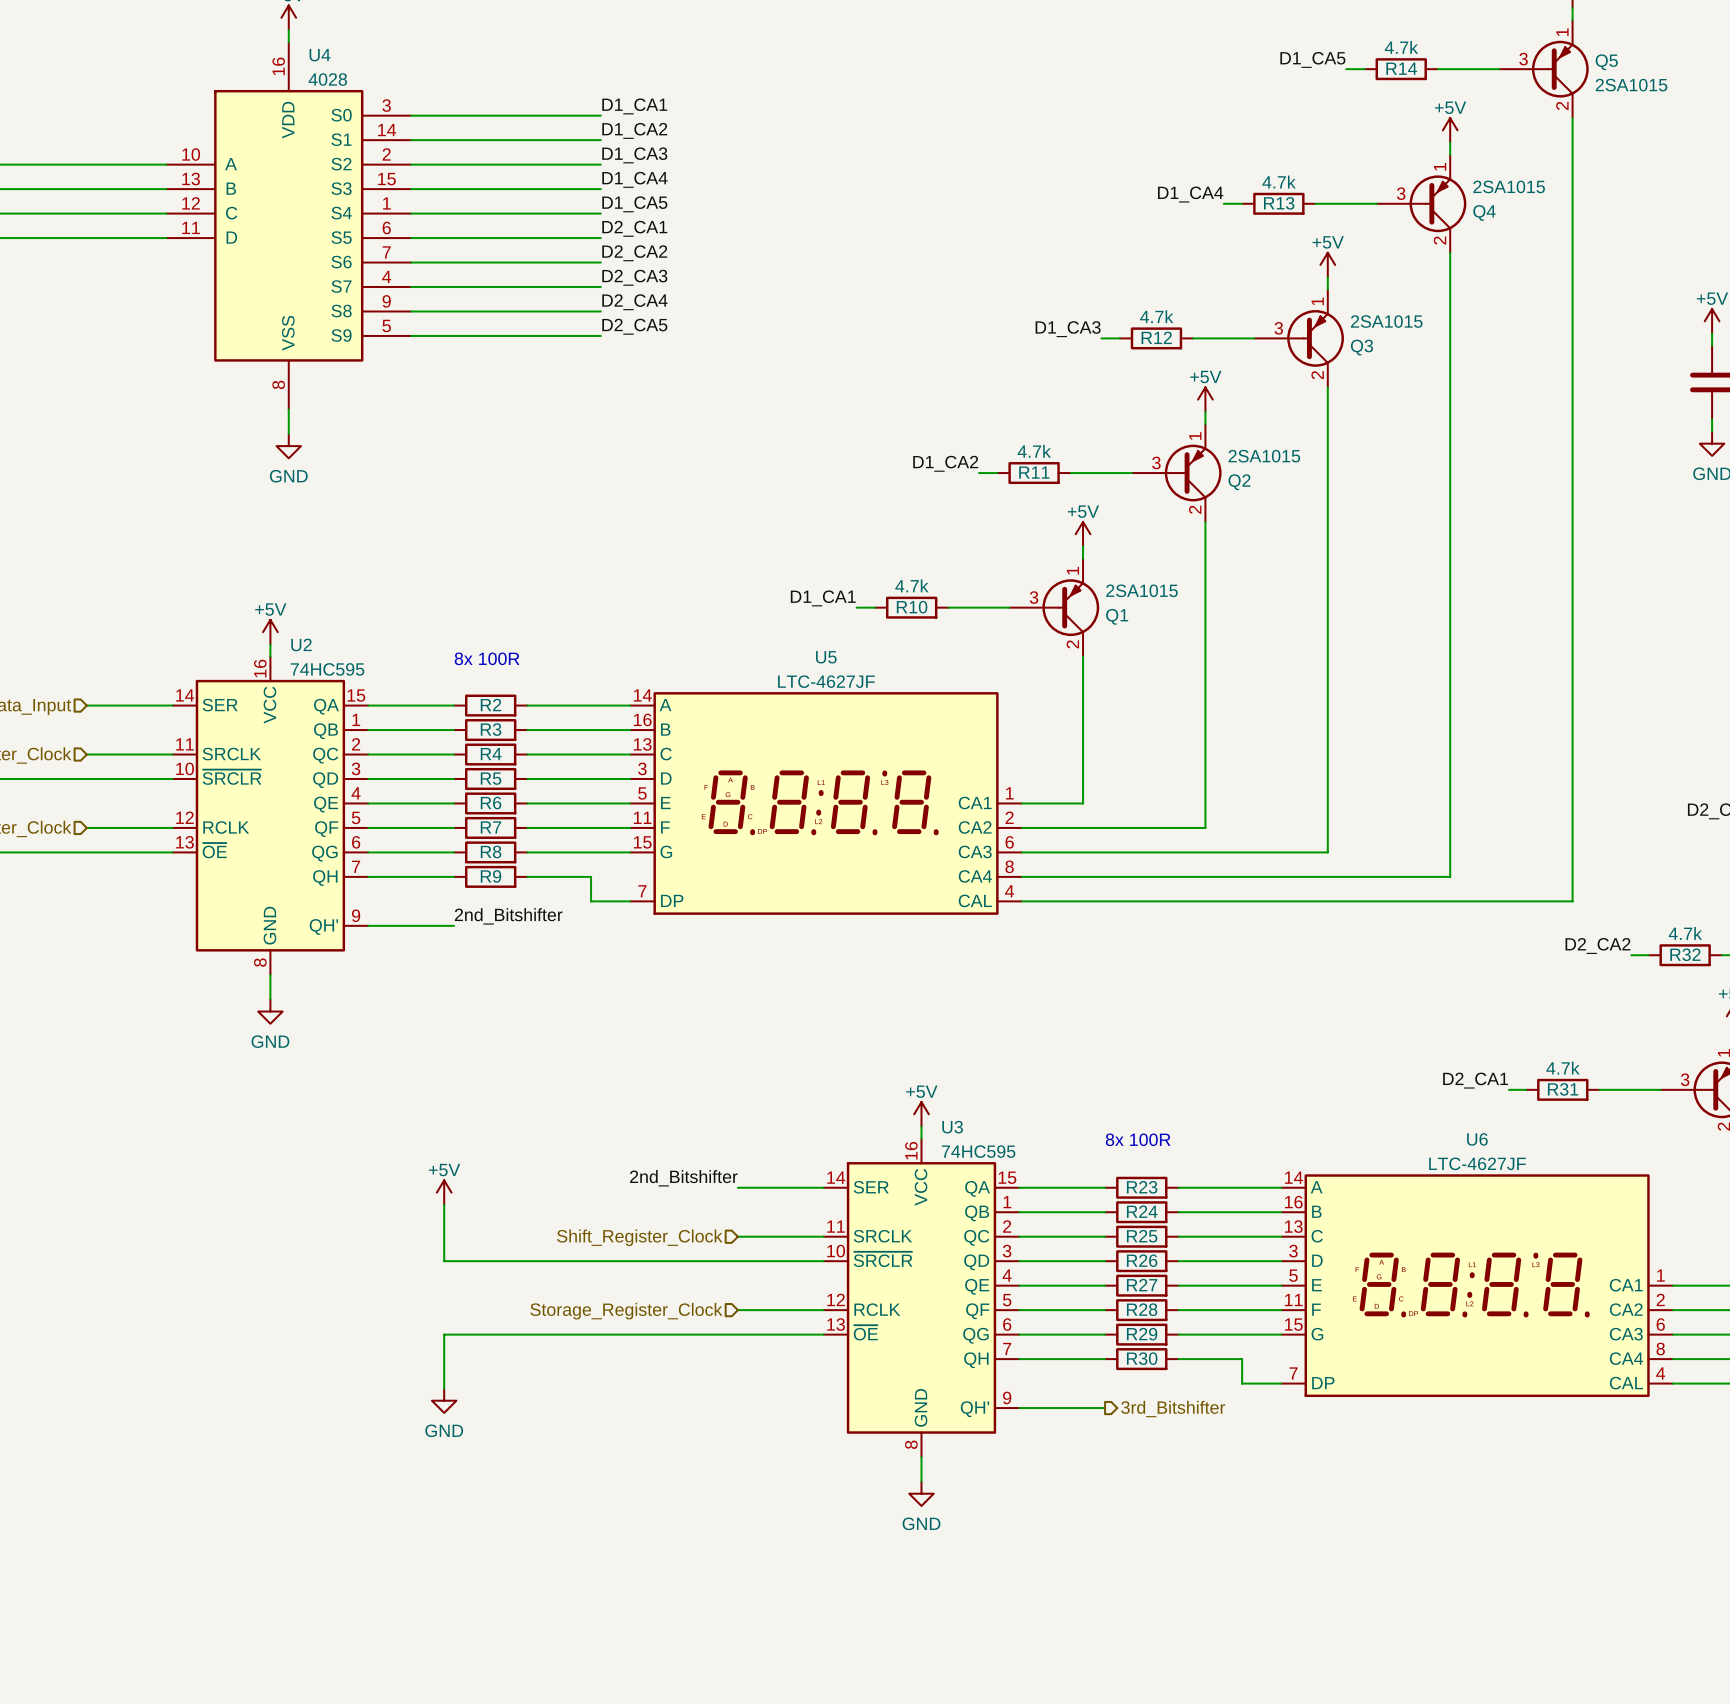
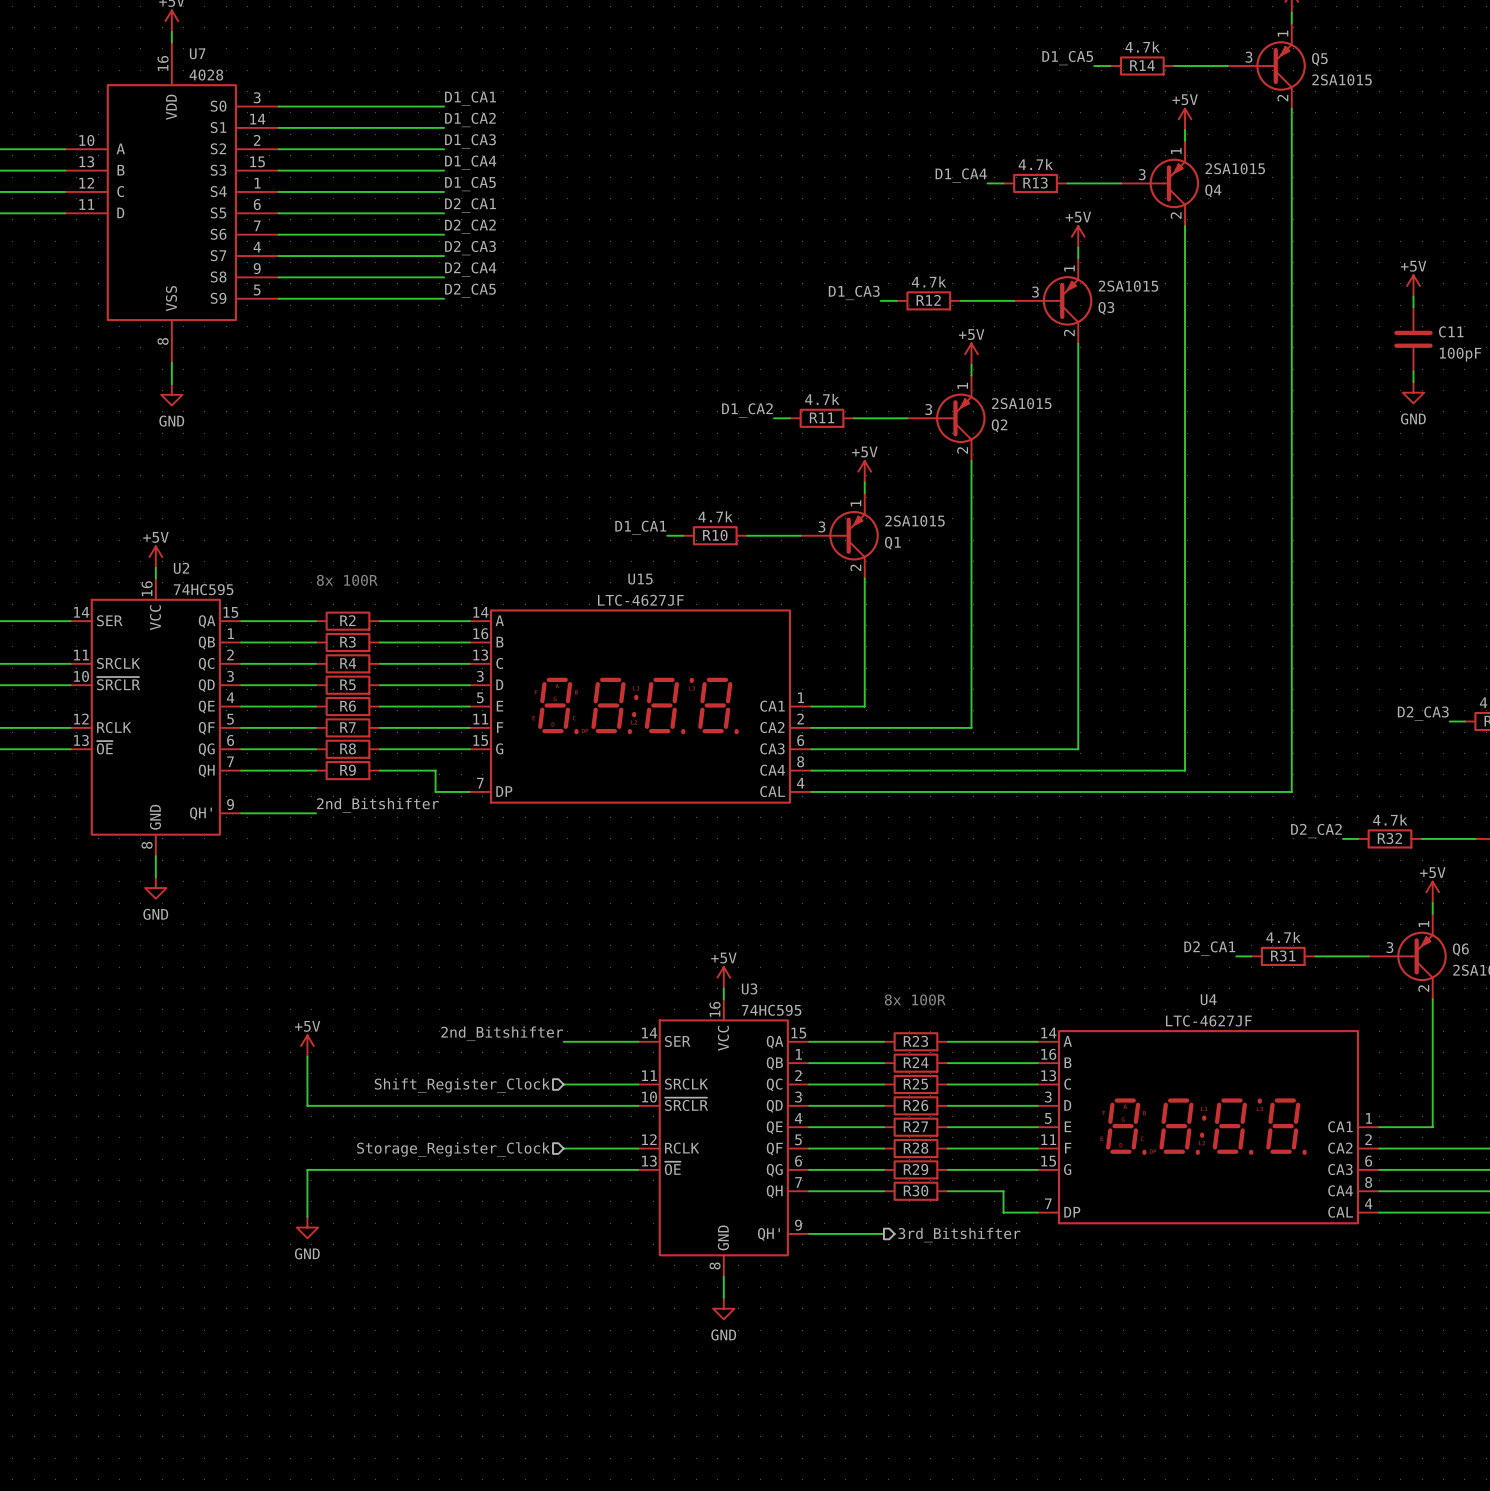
U4 name: U4 (320, 55) -> U7 (197, 53)
U5 name: U5 (826, 657) -> U15 (640, 579)
U6 name: U6 (1477, 1139) -> U4 (1208, 999)

